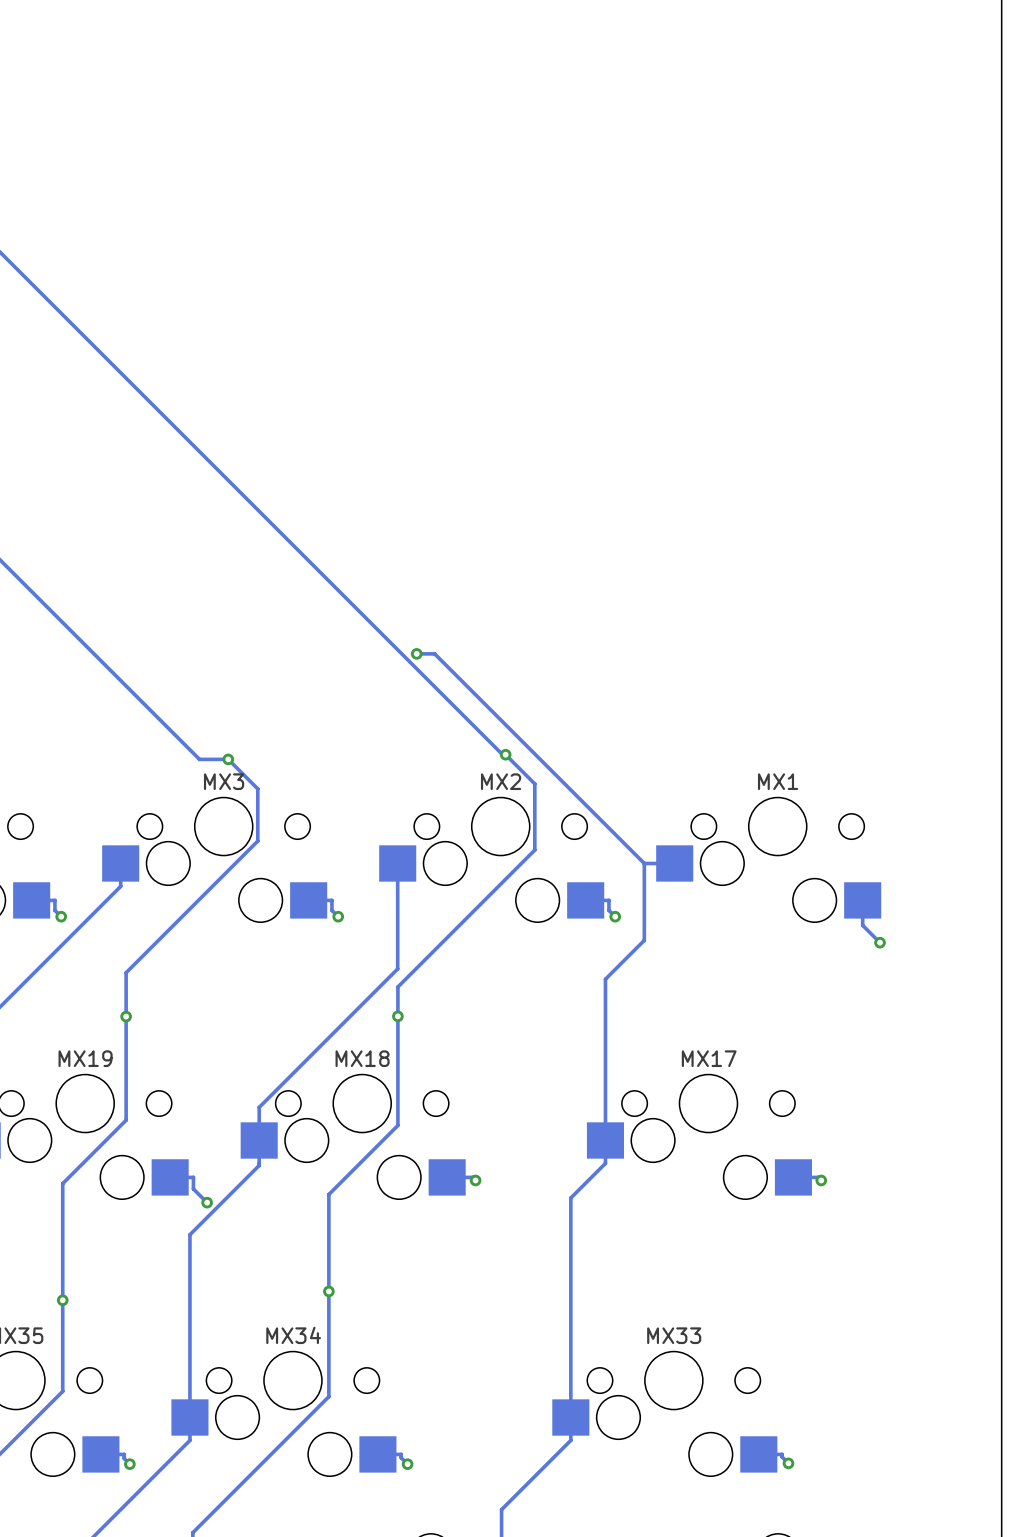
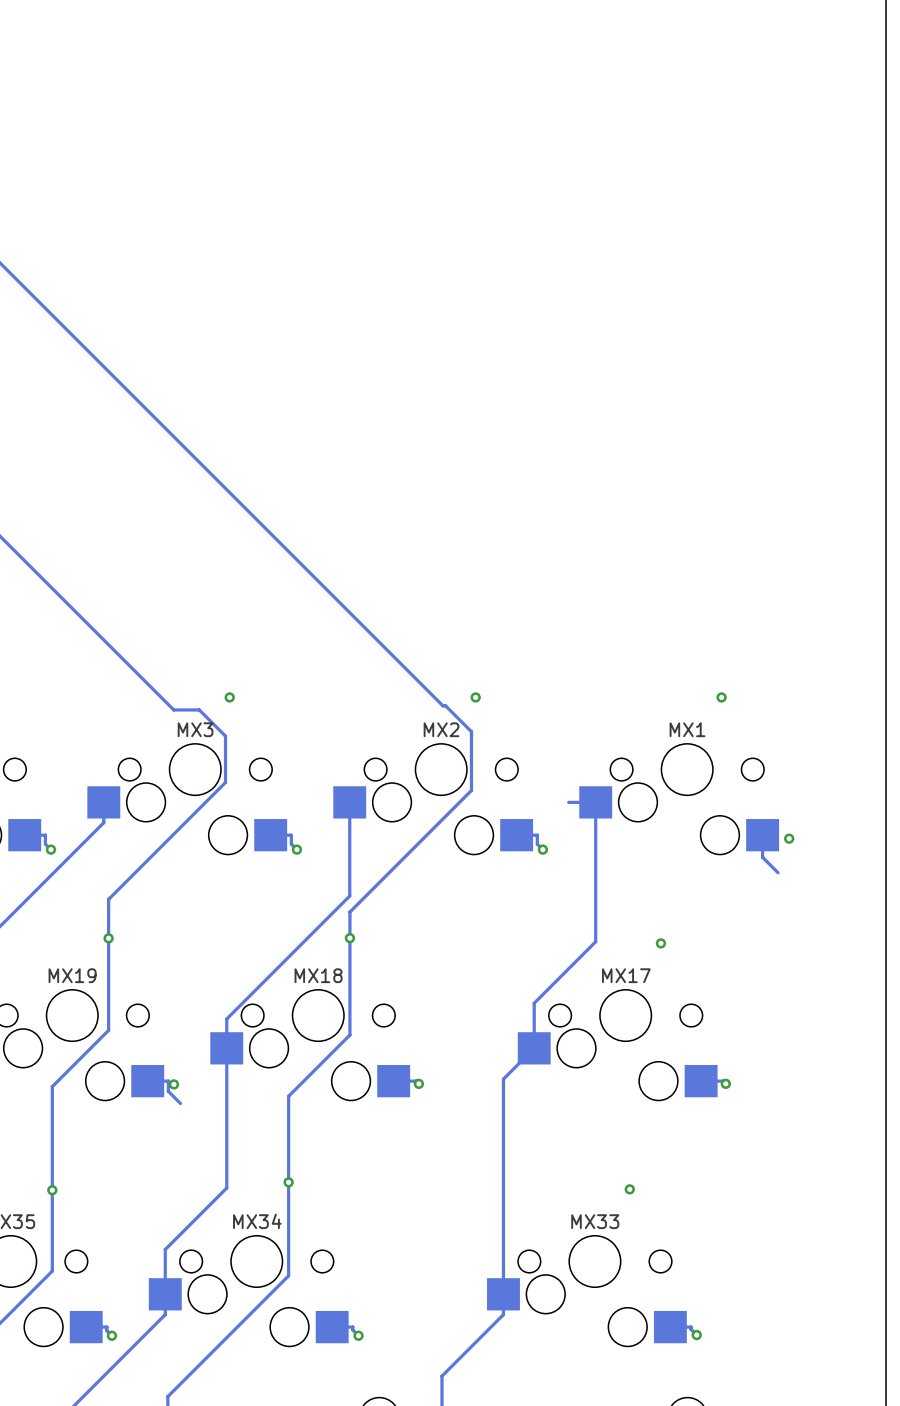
track: (416, 653) (434, 653) (644, 863) (644, 940) (605, 979) (605, 1089) -> (595, 802) (595, 941) (534, 1003)
via: (416, 653) -> none
via: none -> (721, 697)
via position: (505, 754) -> (475, 697)
via position: (228, 759) -> (229, 697)
via position: (880, 942) -> (789, 838)
via: none -> (660, 943)
track: (605, 1140) (605, 1163) (570, 1198) -> (534, 1048) (503, 1079) (503, 1099)
track: (259, 1165) (189, 1234) (189, 1367) -> (226, 1070) (226, 1188) (165, 1249)
via position: (207, 1202) -> (173, 1084)
via: none -> (629, 1189)

